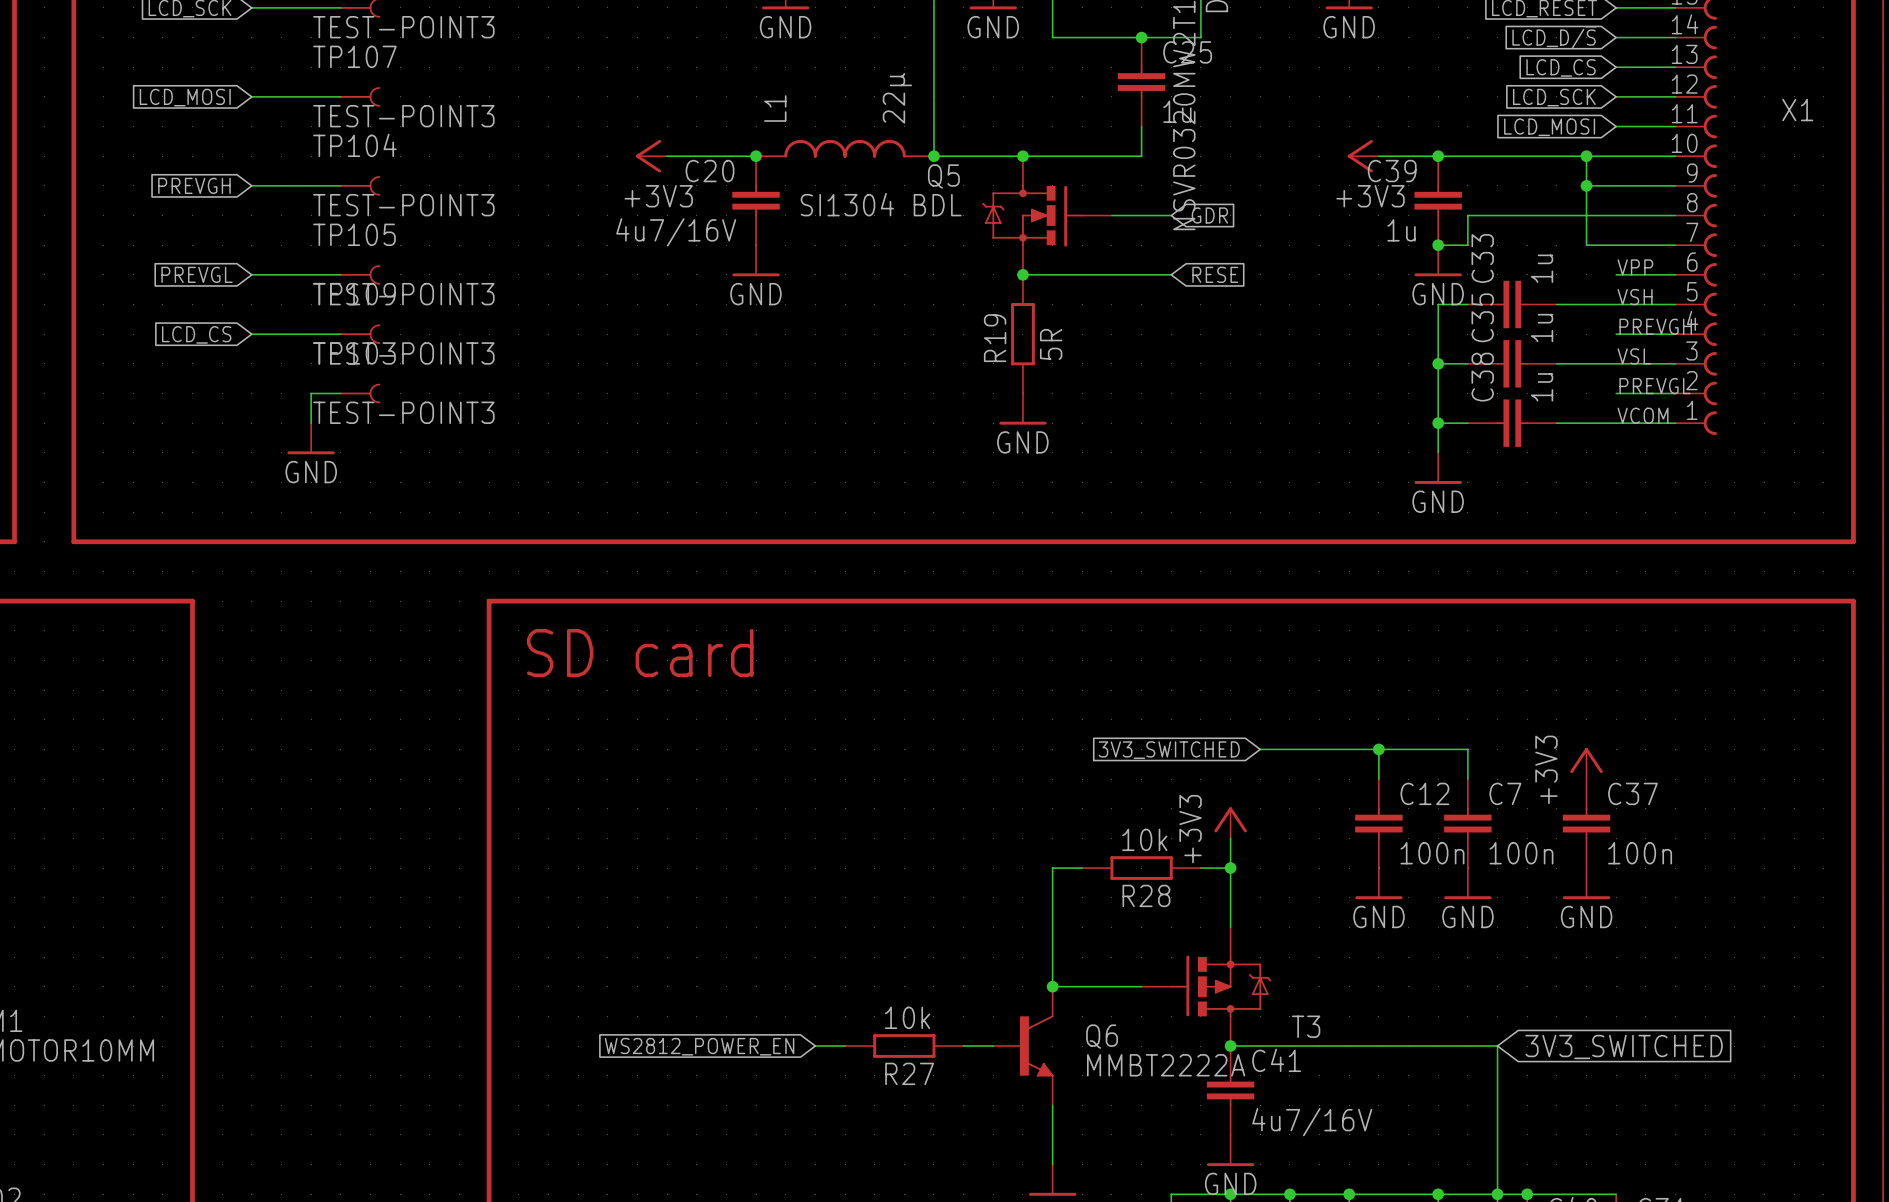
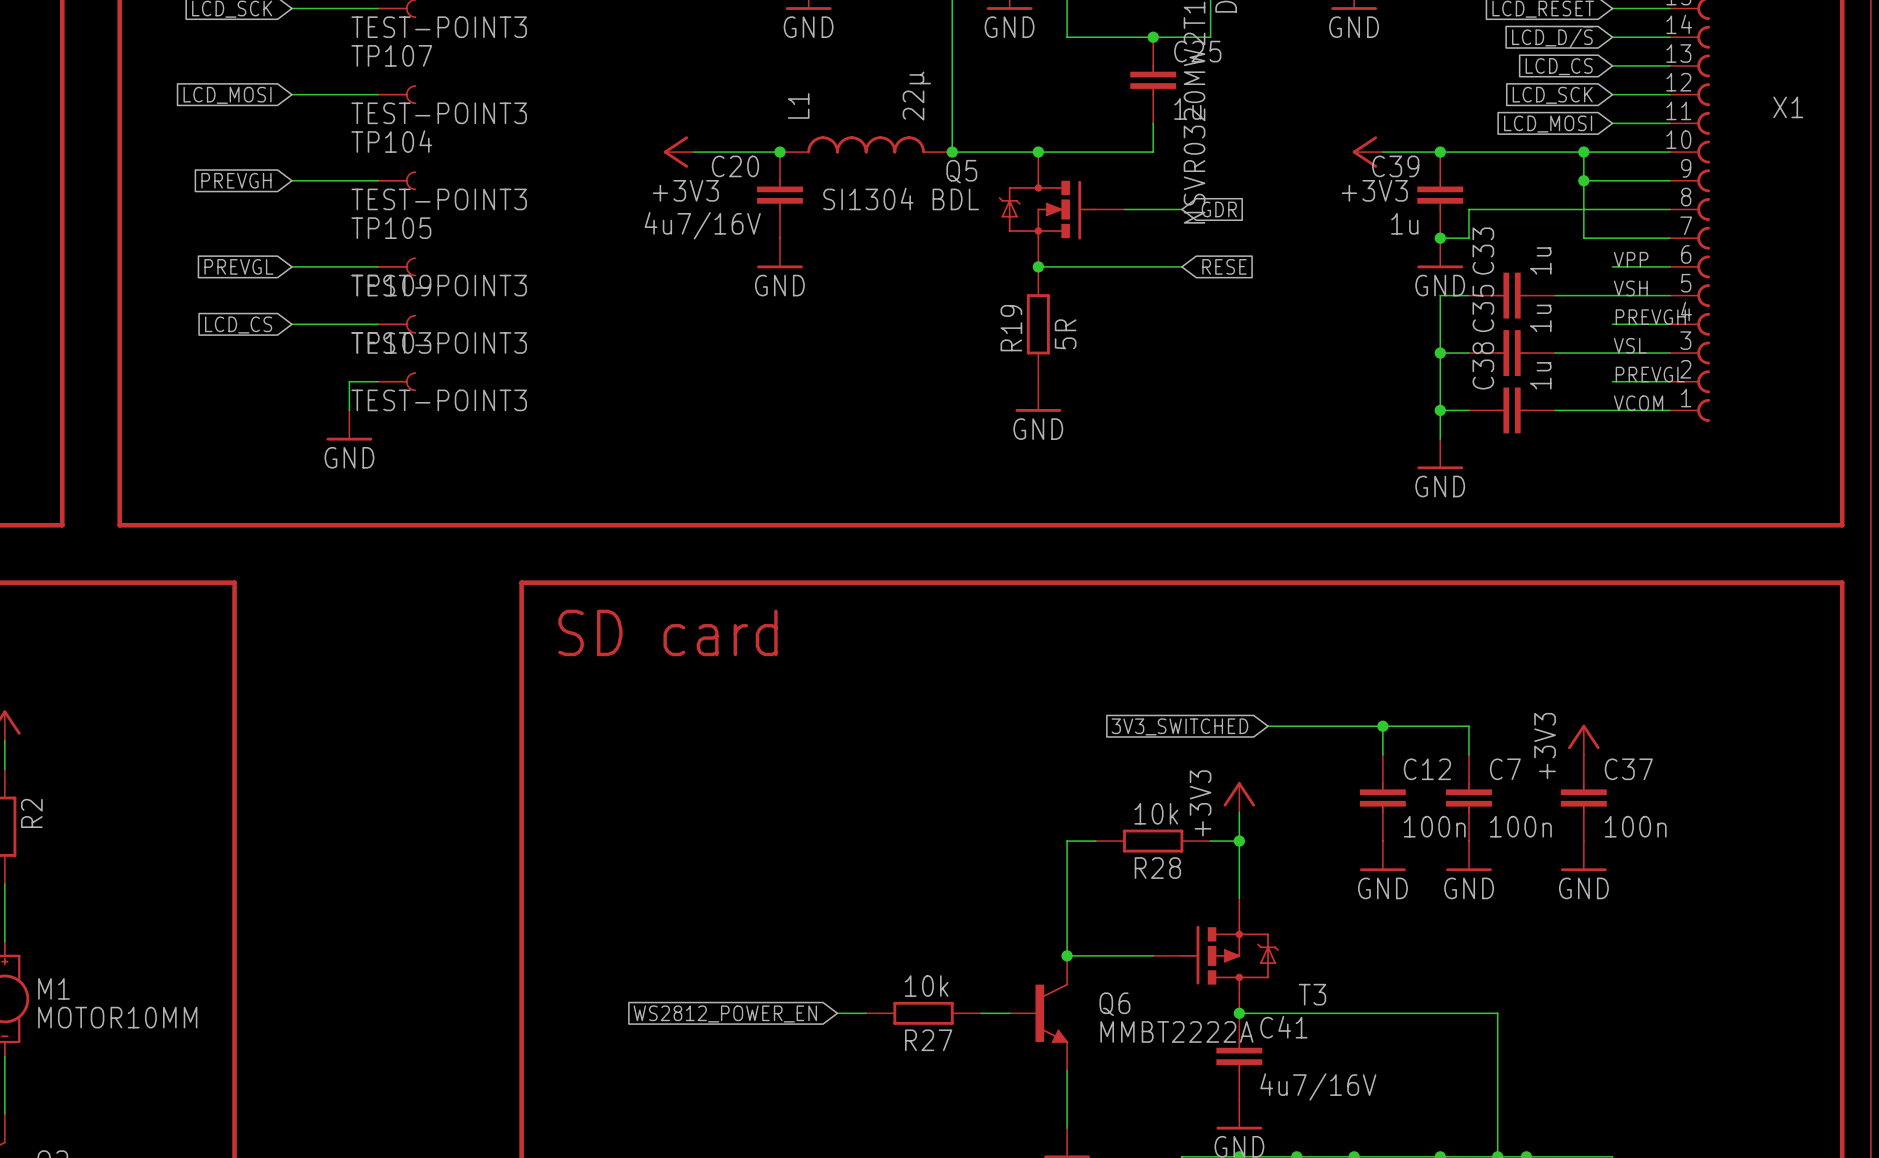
global label: 3V3_SWITCHED (1624, 1046) -> none

